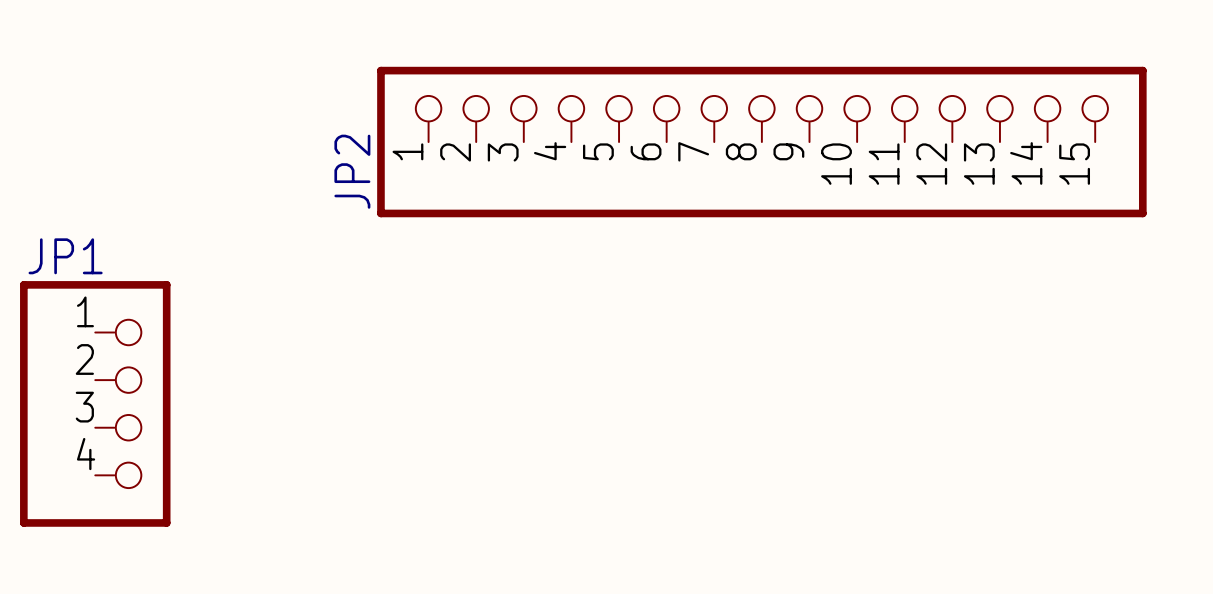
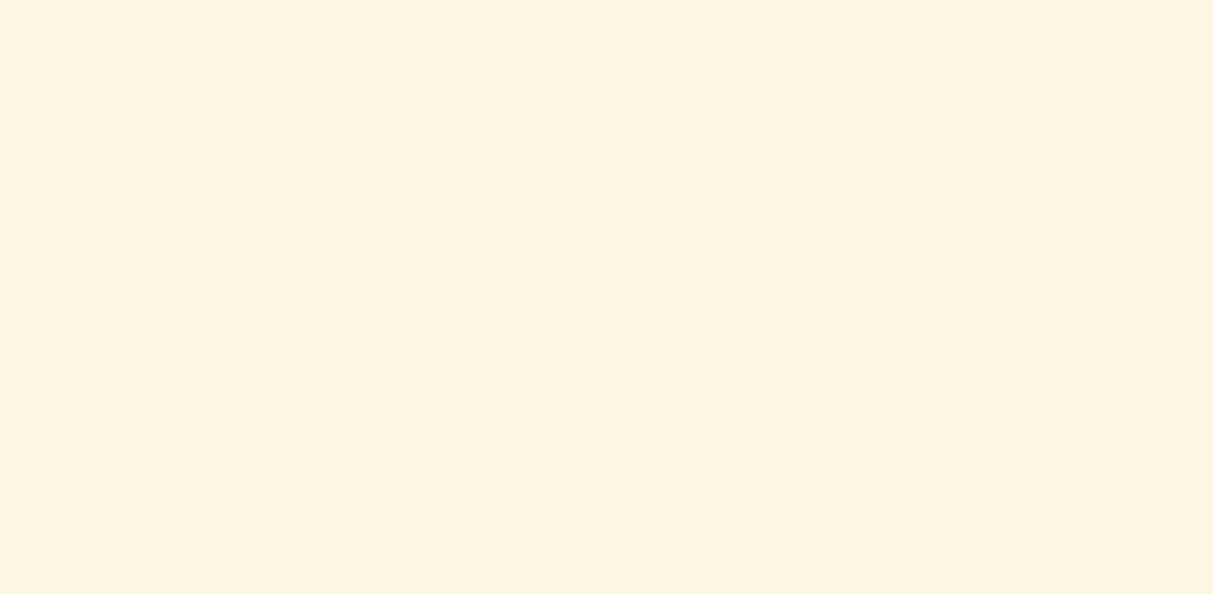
JP2: (761, 142) -> none
JP1: (95, 403) -> none

